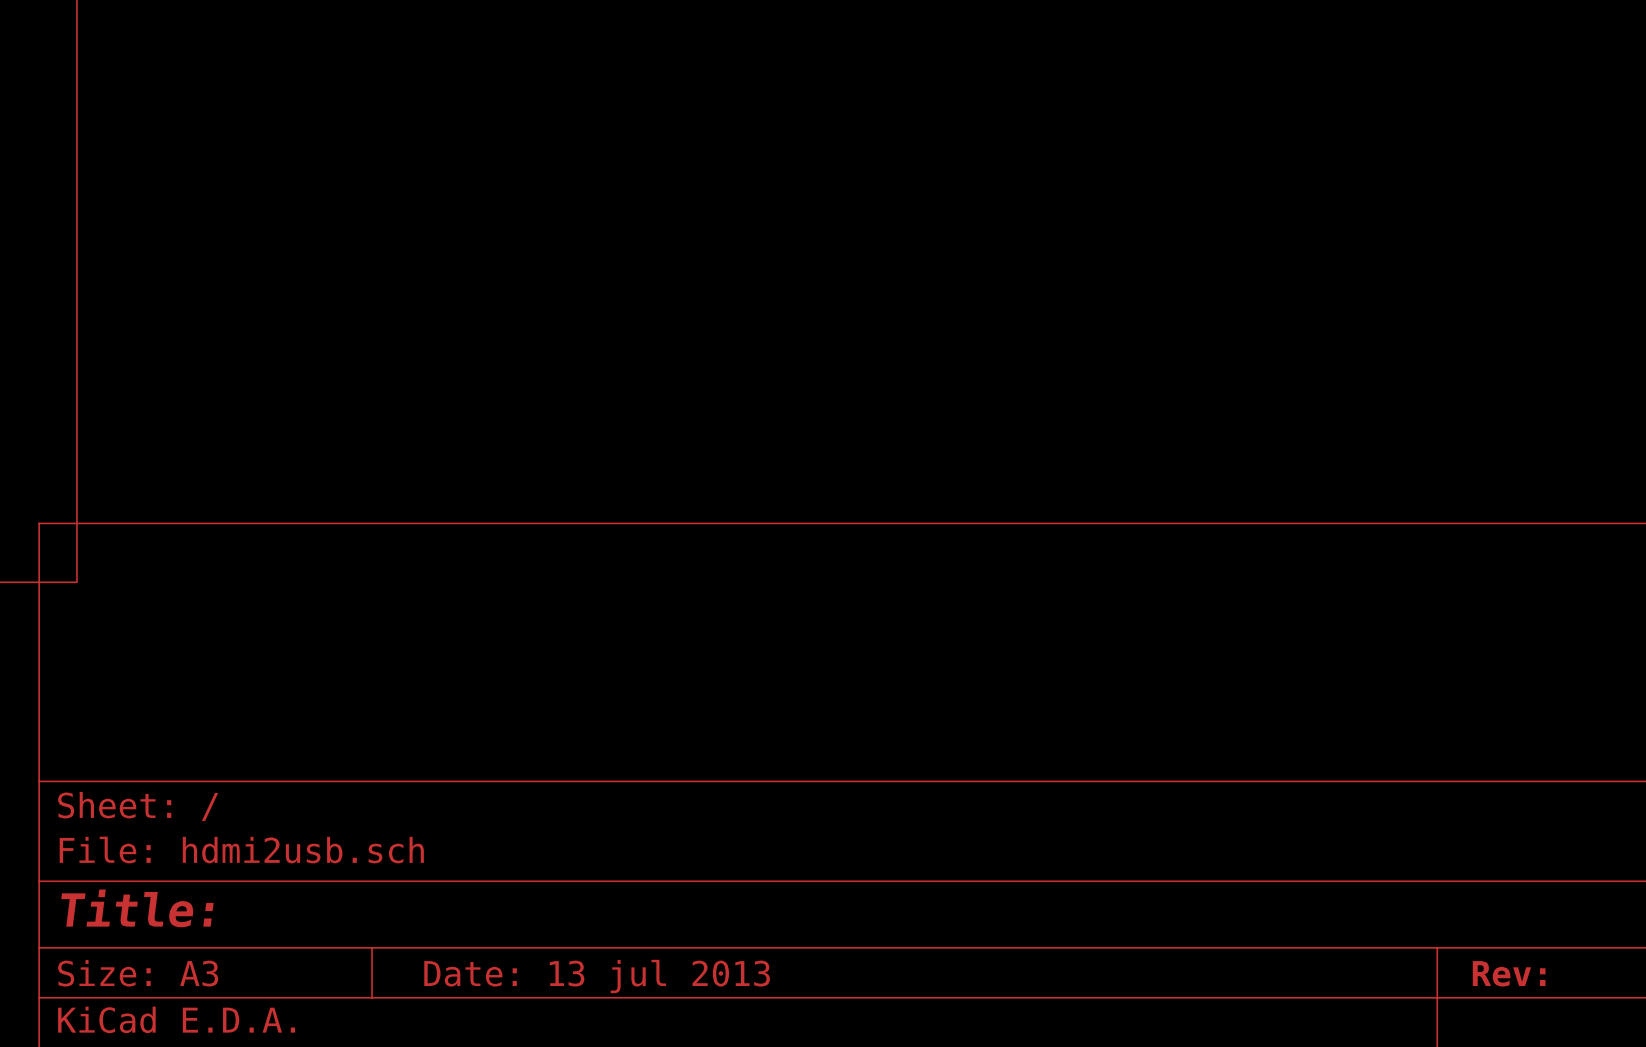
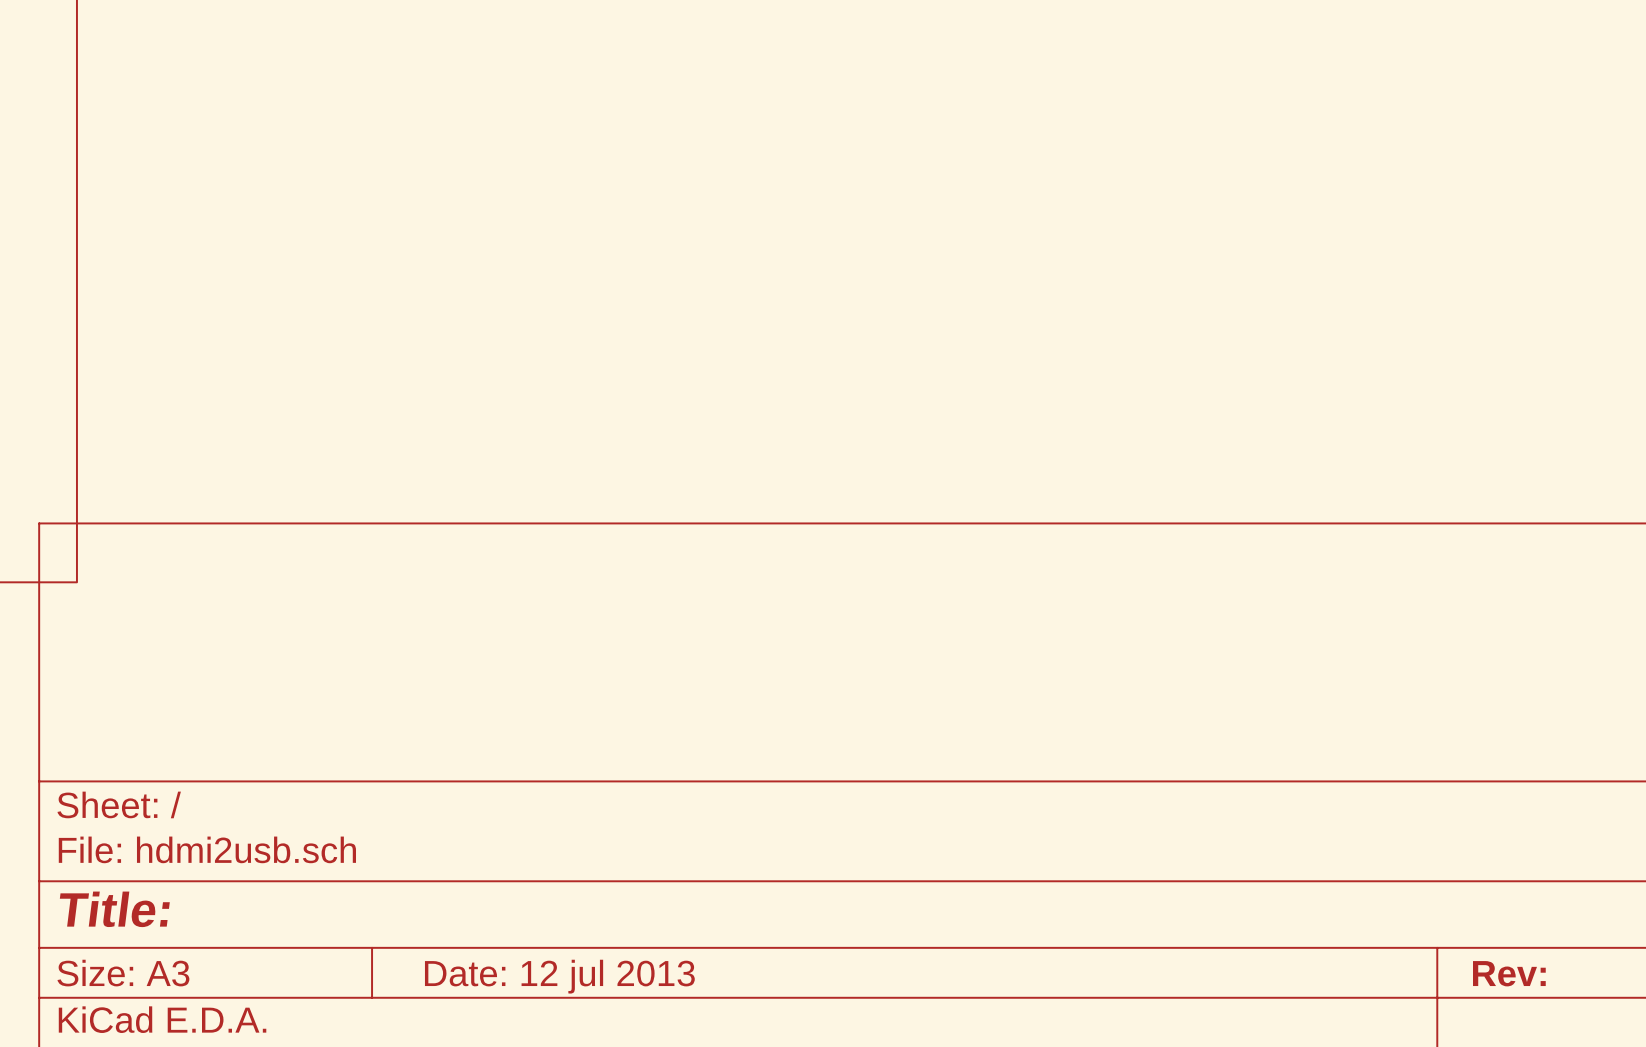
title block: Date: 13 jul 2013 (597, 976) -> Date: 12 jul 2013 (559, 976)

